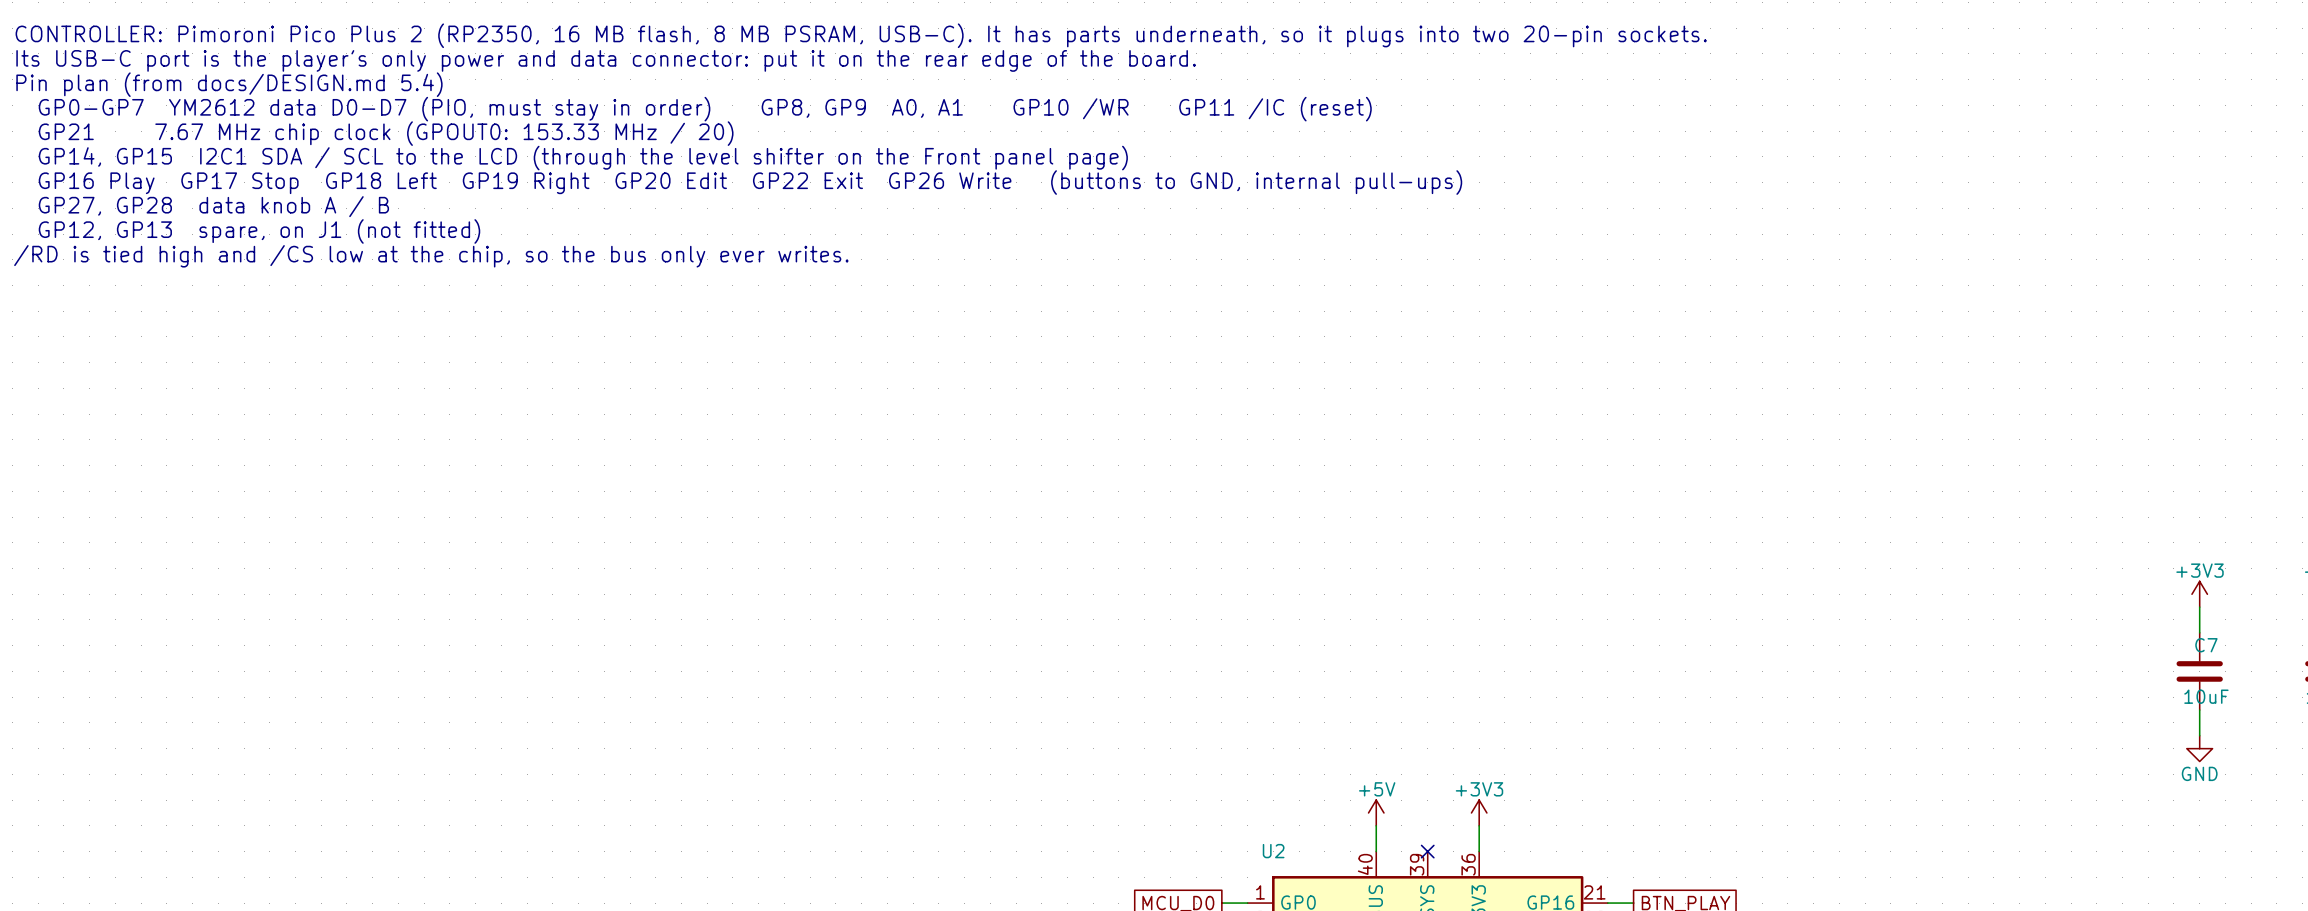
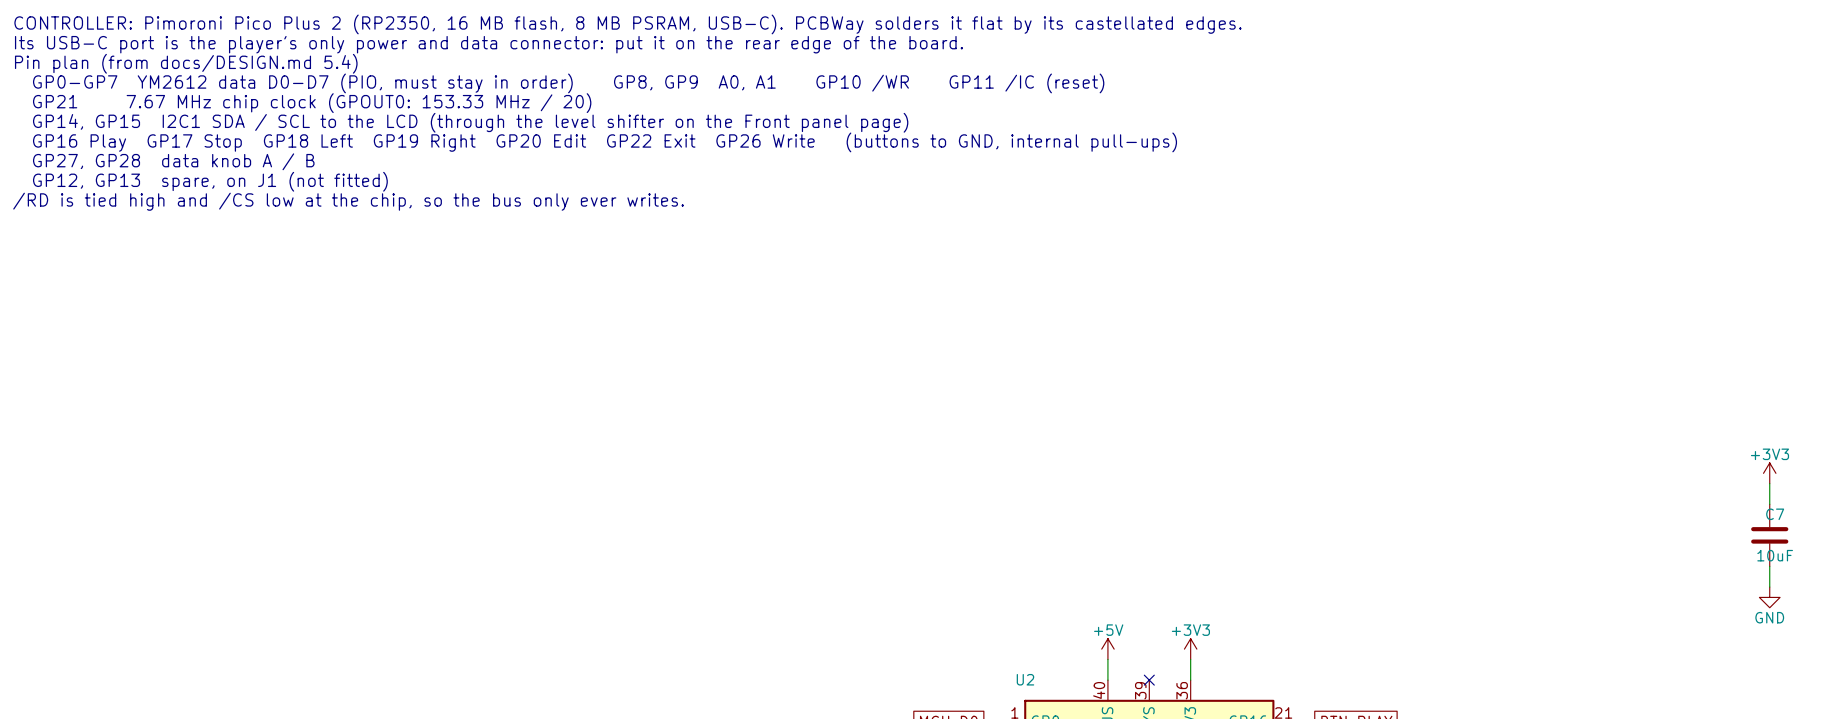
text: CONTROLLER: Pimoroni Pico Plus 2 (RP2350, 16 MB flash, 8 MB PSRAM, USB-C). It has parts underneath, so it plugs into two 20-pin sockets. (861, 35) -> CONTROLLER: Pimoroni Pico Plus 2 (RP2350, 16 MB flash, 8 MB PSRAM, USB-C). PCBWay solders it flat by its castellated edges. (627, 24)

